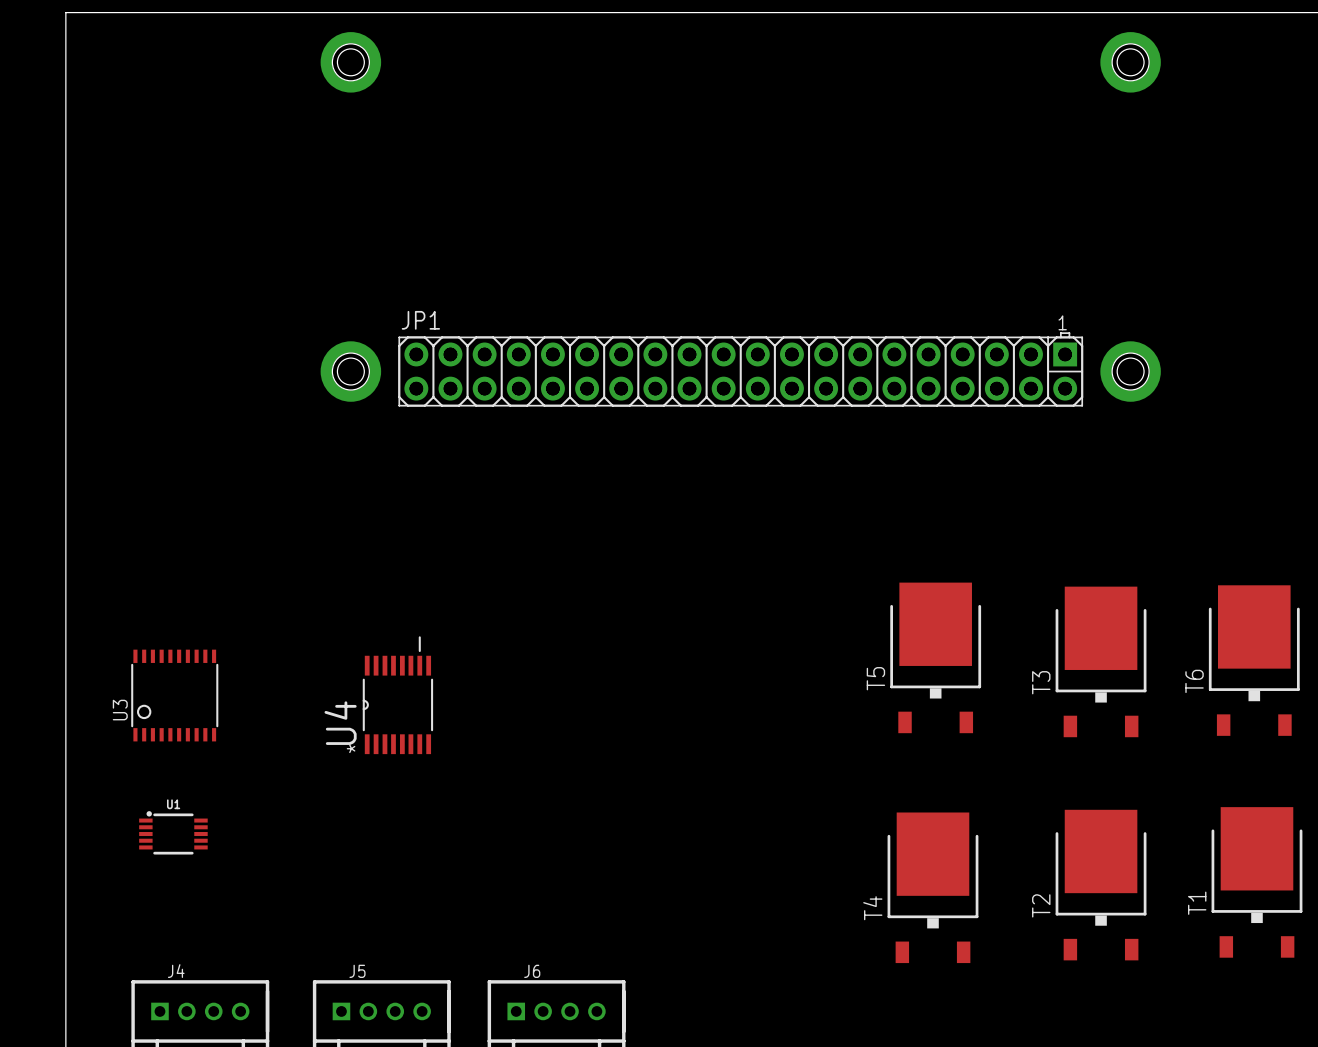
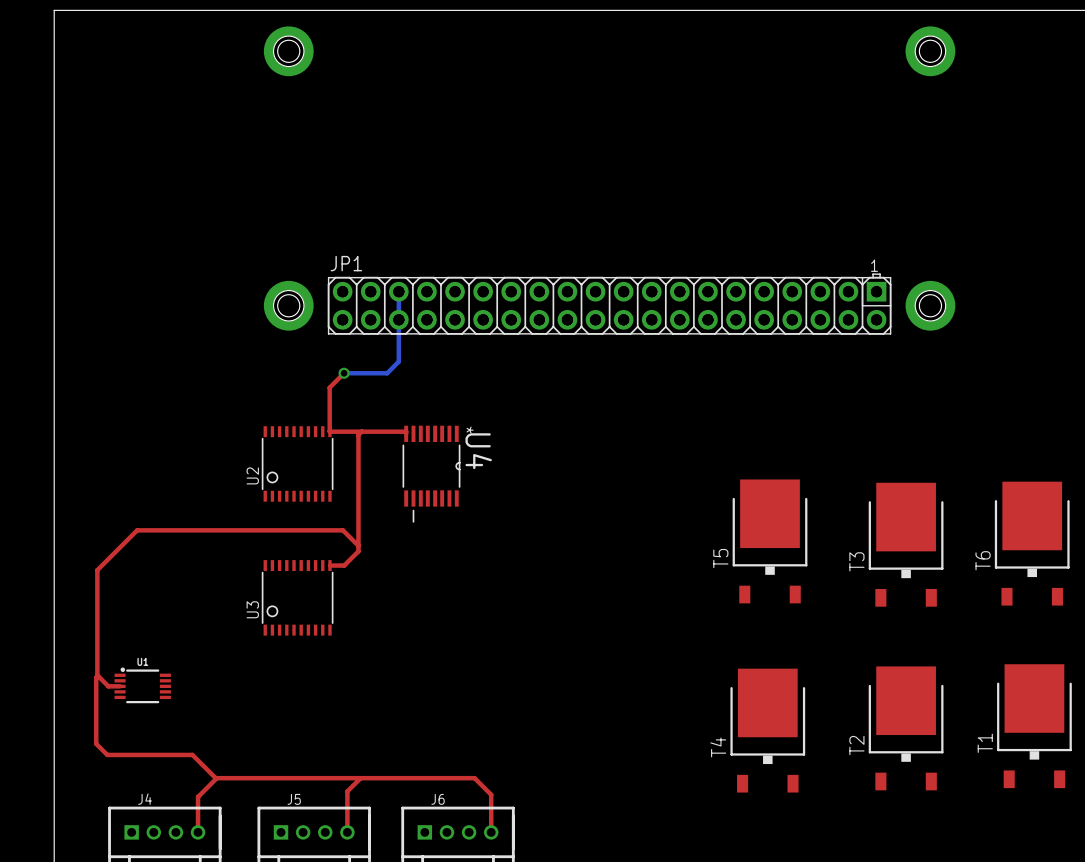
bottom track: none -> (398, 291) (398, 361) (387, 373) (344, 373)
top track: none -> (344, 373) (329, 387) (329, 431) (406, 431) (406, 433)
via: none -> (344, 373)
top track: none -> (361, 431) (358, 435) (358, 551) (344, 565) (329, 565)
U2: none -> (297, 463)
top track: none -> (358, 545) (342, 530) (137, 530) (97, 570) (97, 675) (108, 686) (120, 686)
U3 position: (174, 695) -> (297, 597)
U4 rotation: 0° (397, 695) -> 180° (431, 474)
U4 position: (397, 695) -> (431, 474)
top track: none -> (97, 675) (96, 677) (96, 743) (107, 754) (192, 754) (215, 778) (474, 778) (491, 794) (491, 832)
top track: none -> (216, 778) (198, 796) (198, 832)
top track: none -> (360, 778) (347, 791) (347, 832)

